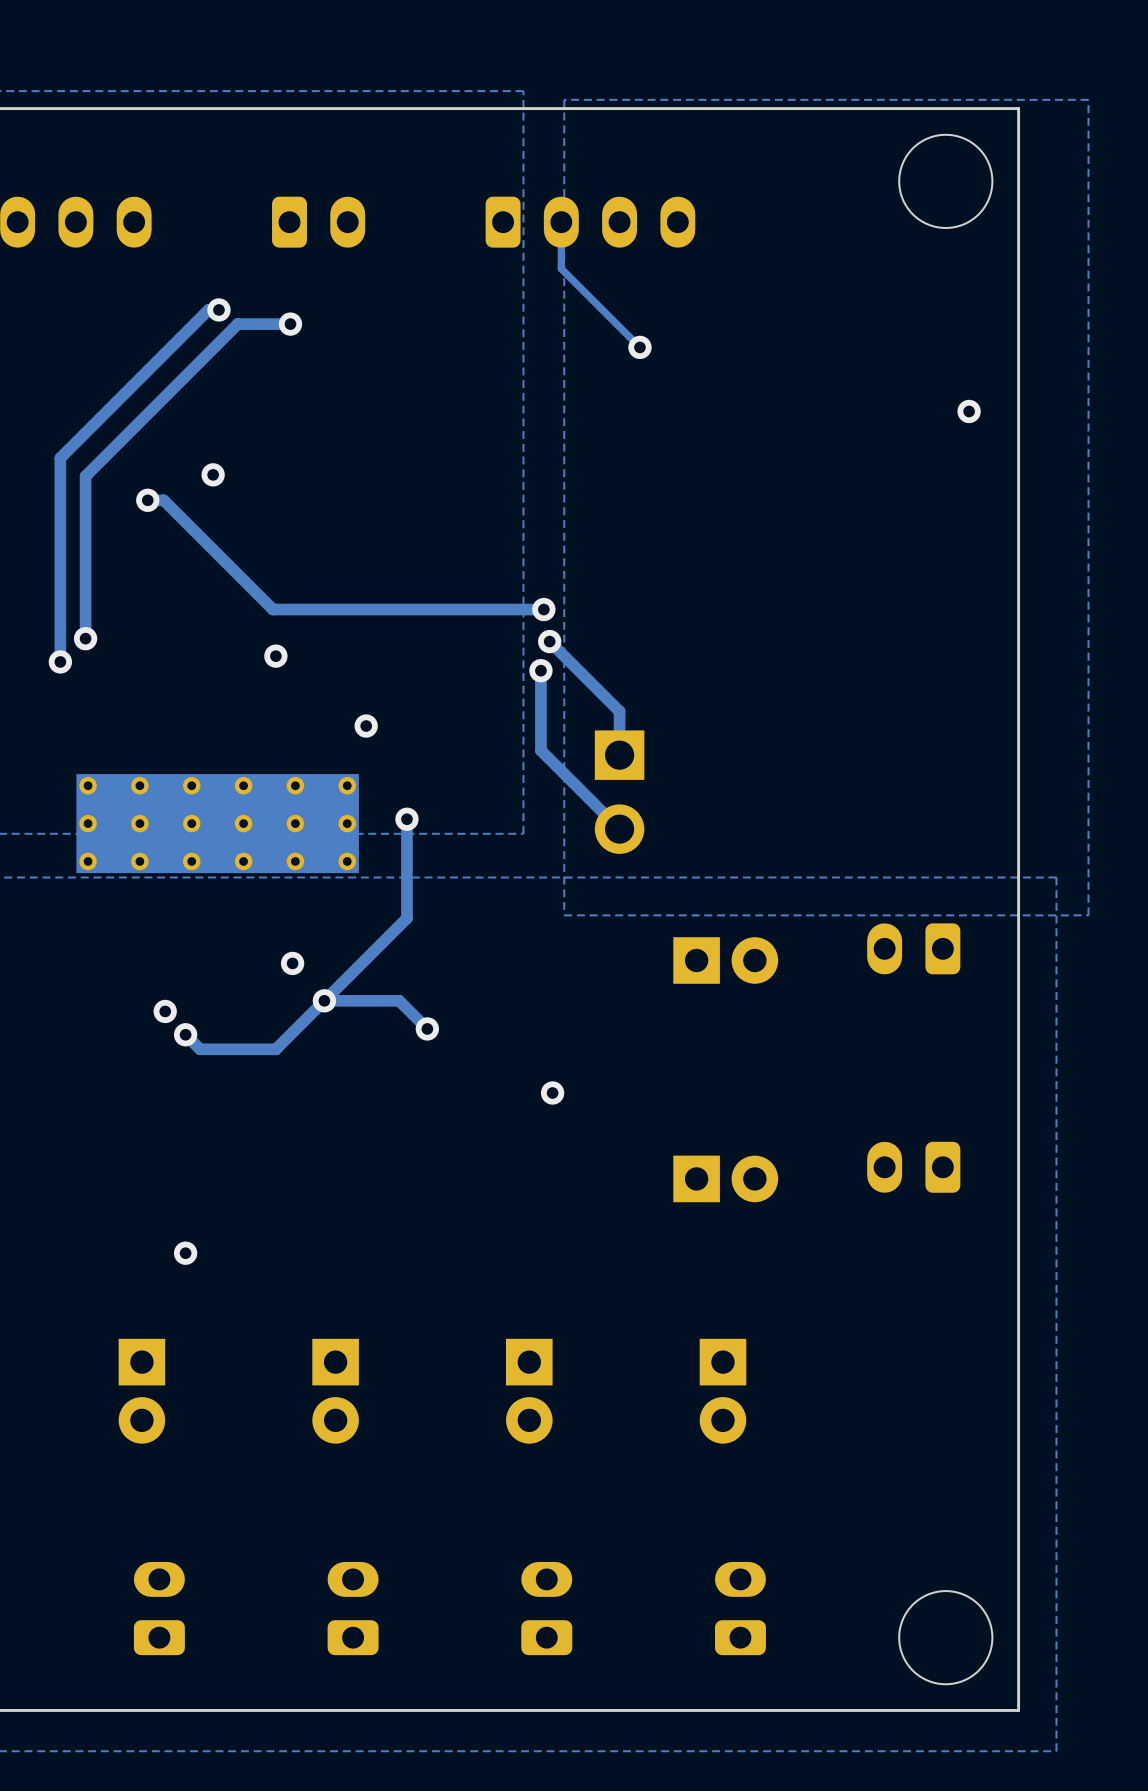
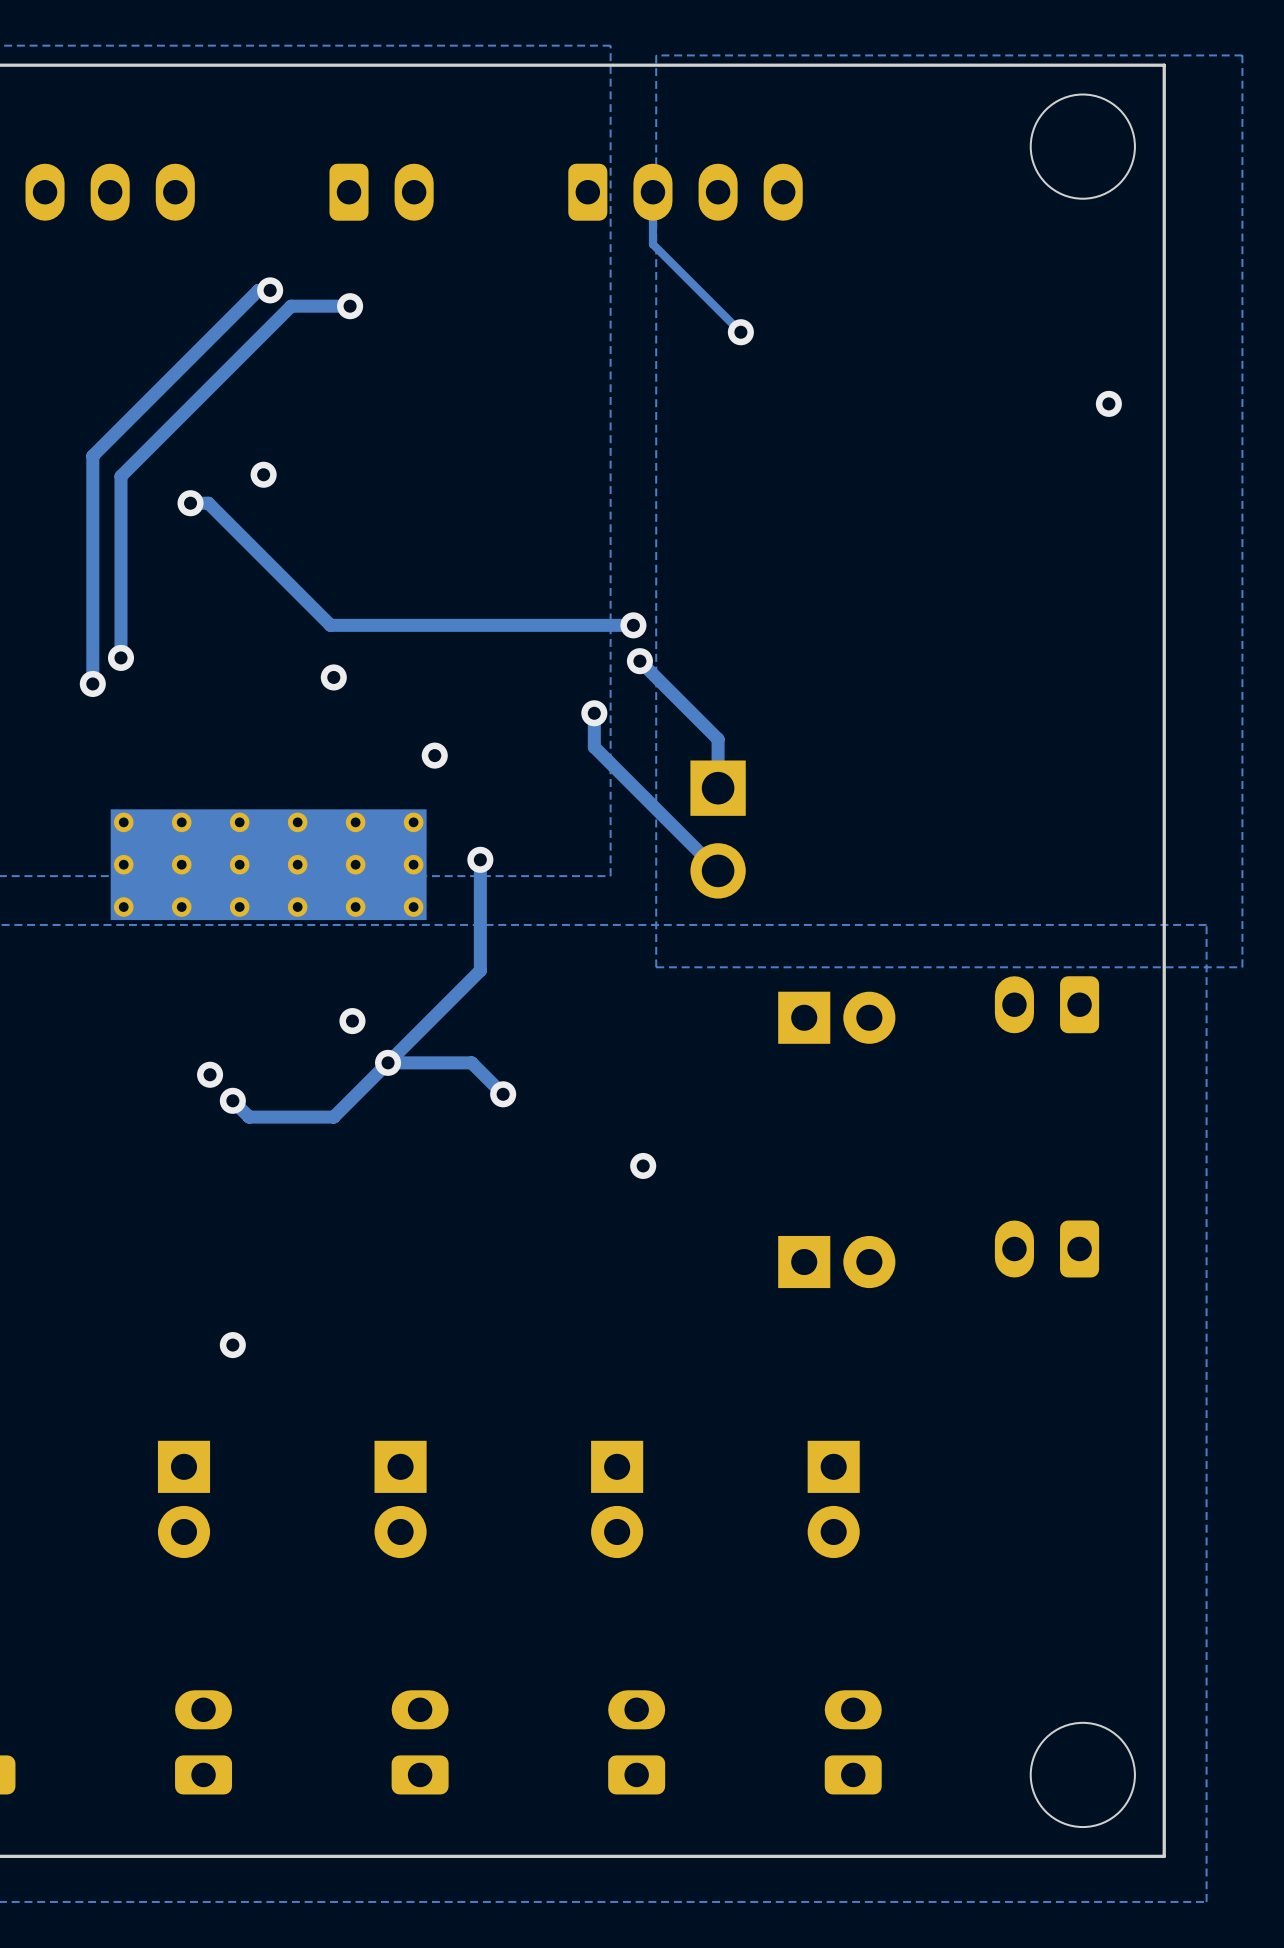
track: (540, 670) (540, 750) -> (594, 713) (594, 747) (630, 782)
via position: (540, 670) -> (594, 713)

